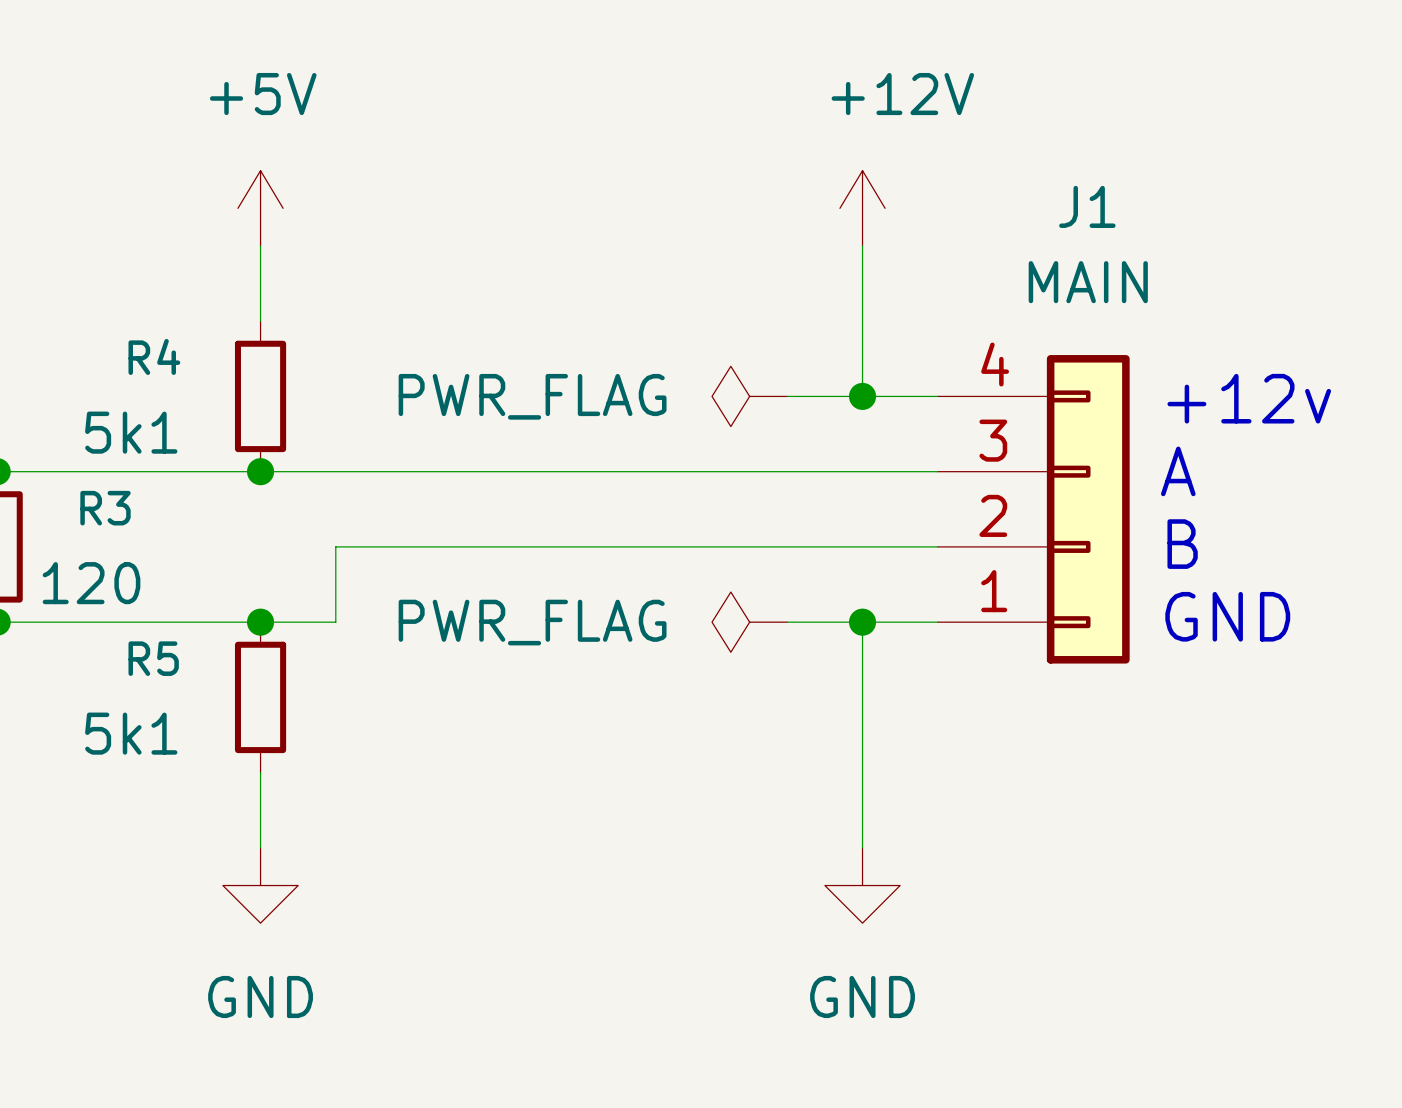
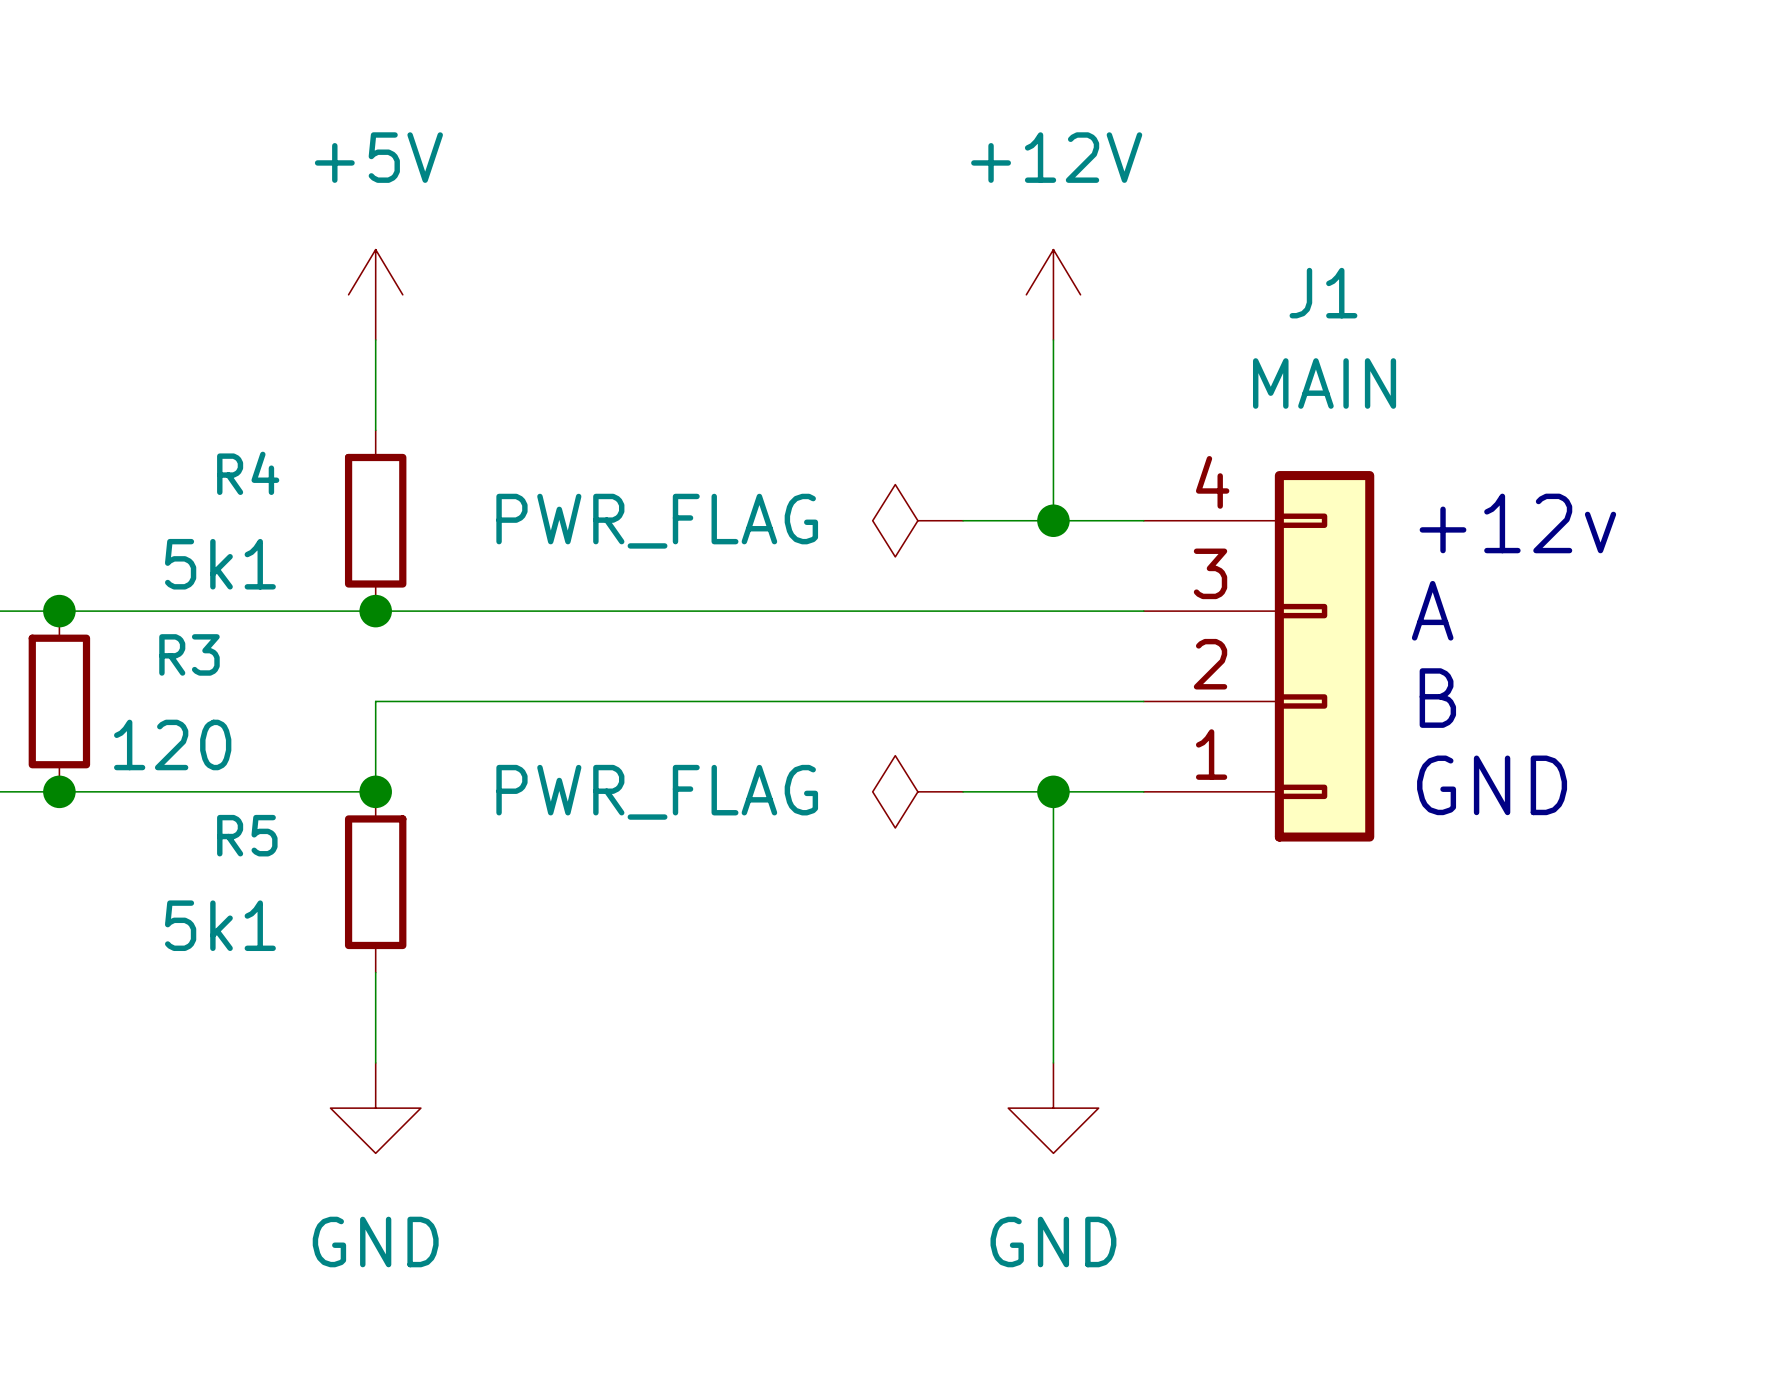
power symbol text position: +12V (902, 94) -> +12V (1056, 157)
power symbol position: +12V (862, 208) -> +12V (1053, 294)
wire: (862, 245) (862, 396) -> (1053, 340) (1053, 520)
power symbol position: PWR_FLAG (749, 396) -> PWR_FLAG (917, 520)
junction position: (862, 396) -> (1053, 520)
text position: +12v (1249, 398) -> +12v (1517, 523)
text position: A (1178, 471) -> A (1432, 610)
J1 position: (1033, 509) -> (1259, 656)
text position: B (1182, 544) -> B (1437, 698)
wire: (335, 546) (335, 622) (260, 622) -> (466, 701) (375, 701) (375, 791)
text position: GND (1227, 616) -> GND (1492, 785)
power symbol position: PWR_FLAG (749, 622) -> PWR_FLAG (917, 791)
wire: (862, 622) (862, 847) -> (1053, 791) (1053, 1062)
junction position: (862, 622) -> (1053, 791)
power symbol position: GND (862, 885) -> GND (1053, 1108)

